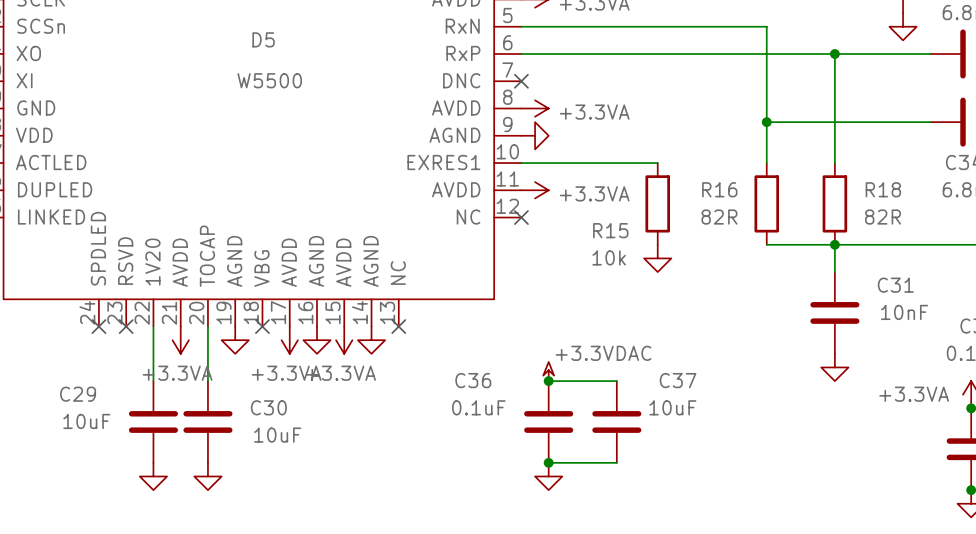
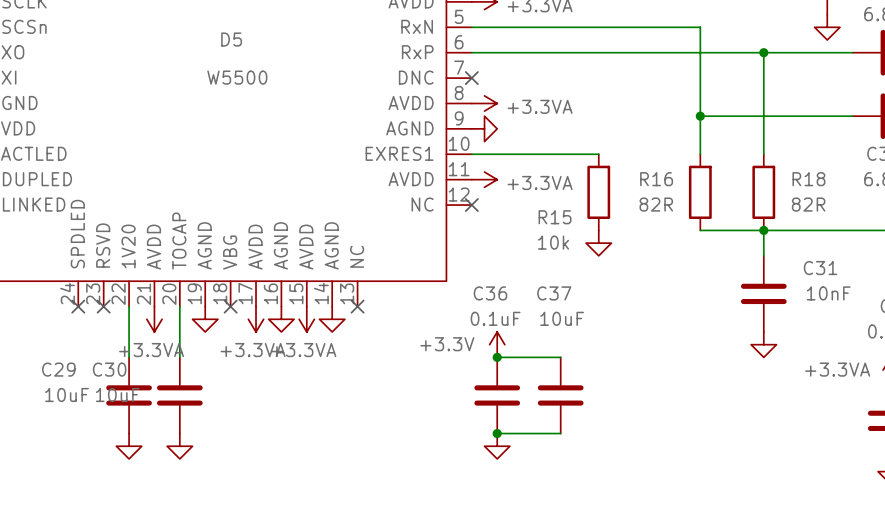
power symbol: +3.3VDAC (548, 371) -> +3.3V (497, 344)
C36 name position: C36 (473, 380) -> C36 (490, 293)
C37 name position: C37 (678, 380) -> C37 (554, 293)
C30 name position: C30 (268, 407) -> C30 (109, 369)
C36 value position: 0.1uF (478, 407) -> 0.1uF (495, 318)
C37 value position: 10uF (672, 407) -> 10uF (562, 318)
C30 value position: 10uF (277, 435) -> 10uF (117, 394)

